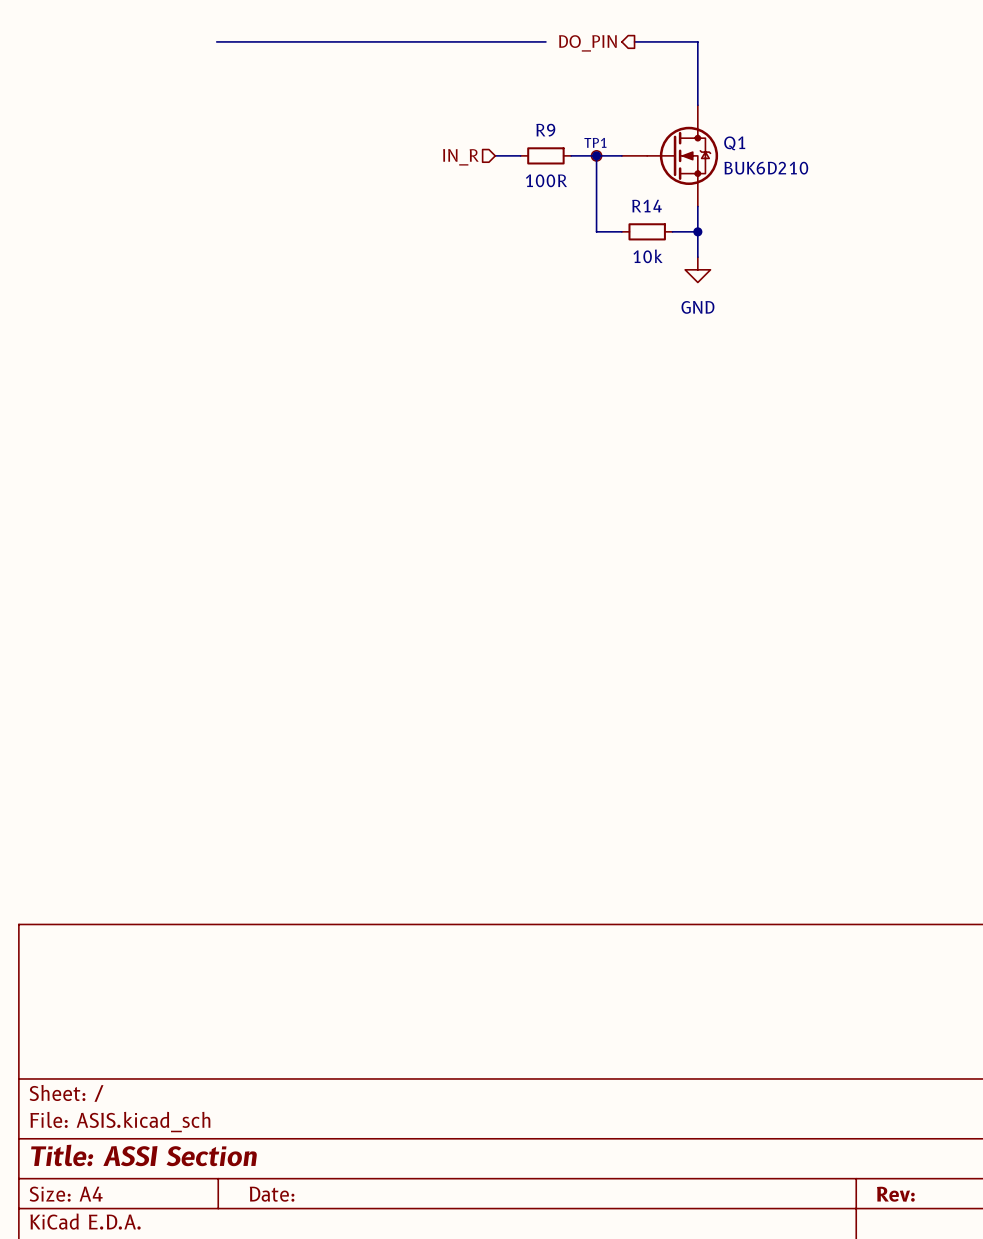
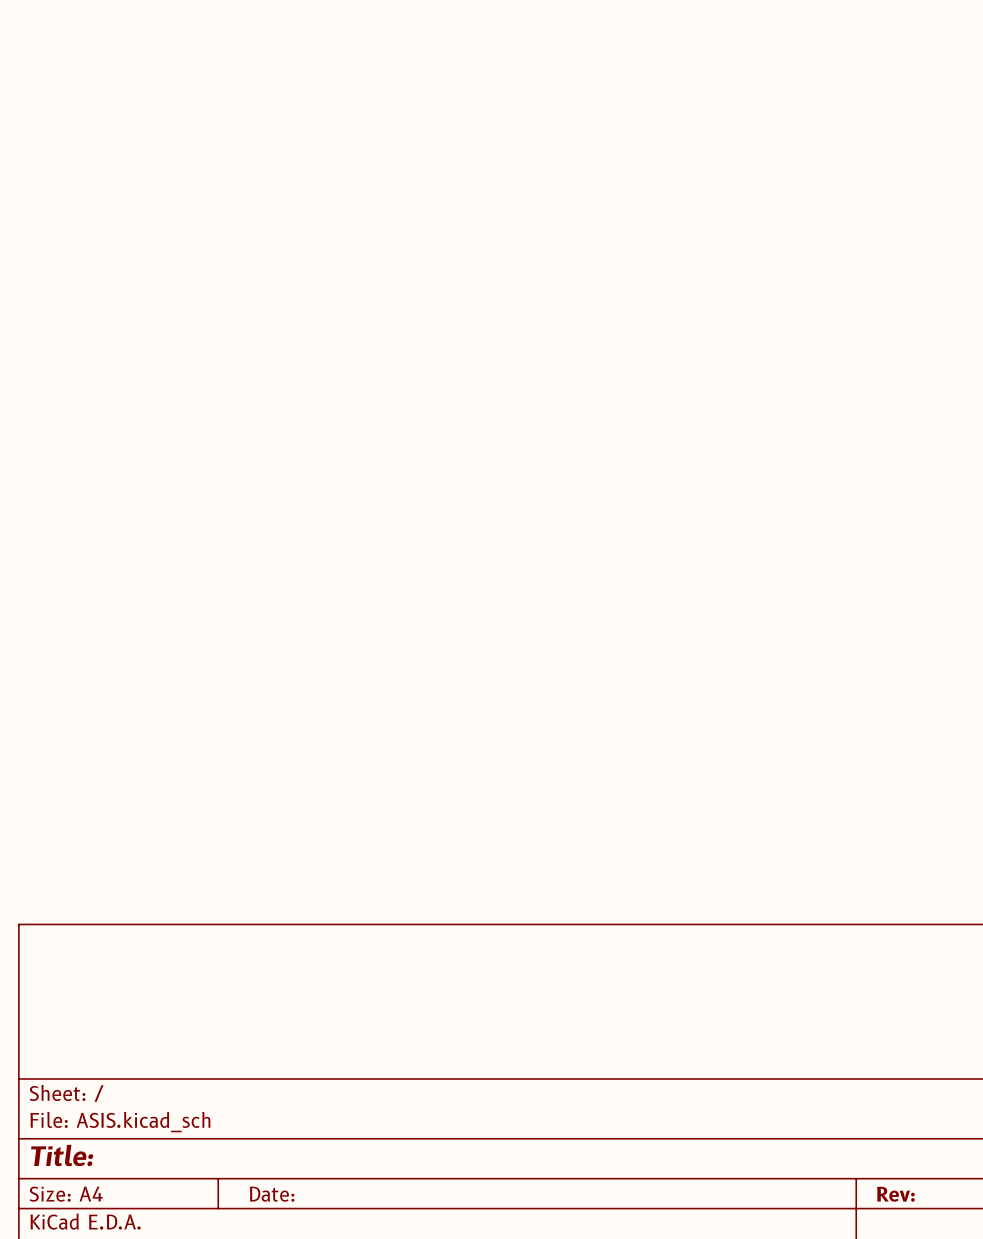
line: (216, 41) (545, 41) -> none
wire: (634, 41) (697, 41) (697, 105) -> none
hierarchical label: DO_PIN (587, 43) -> none
wire: (495, 155) (520, 155) -> none
R9: 100R (545, 155) -> none
wire: (571, 155) (621, 155) -> none
wire: (596, 155) (596, 231) (621, 231) -> none
junction: (596, 155) -> none
TP1: (596, 155) -> none
Q1: BUK6D210 (669, 155) -> none
hierarchical label: IN_R (460, 157) -> none
wire: (697, 206) (697, 257) -> none
R14: 10k (647, 231) -> none
wire: (672, 231) (697, 231) -> none
junction: (697, 231) -> none
power symbol: GND (697, 269) -> none
title block: Title: ASSI Section (143, 1155) -> Title: (62, 1155)

